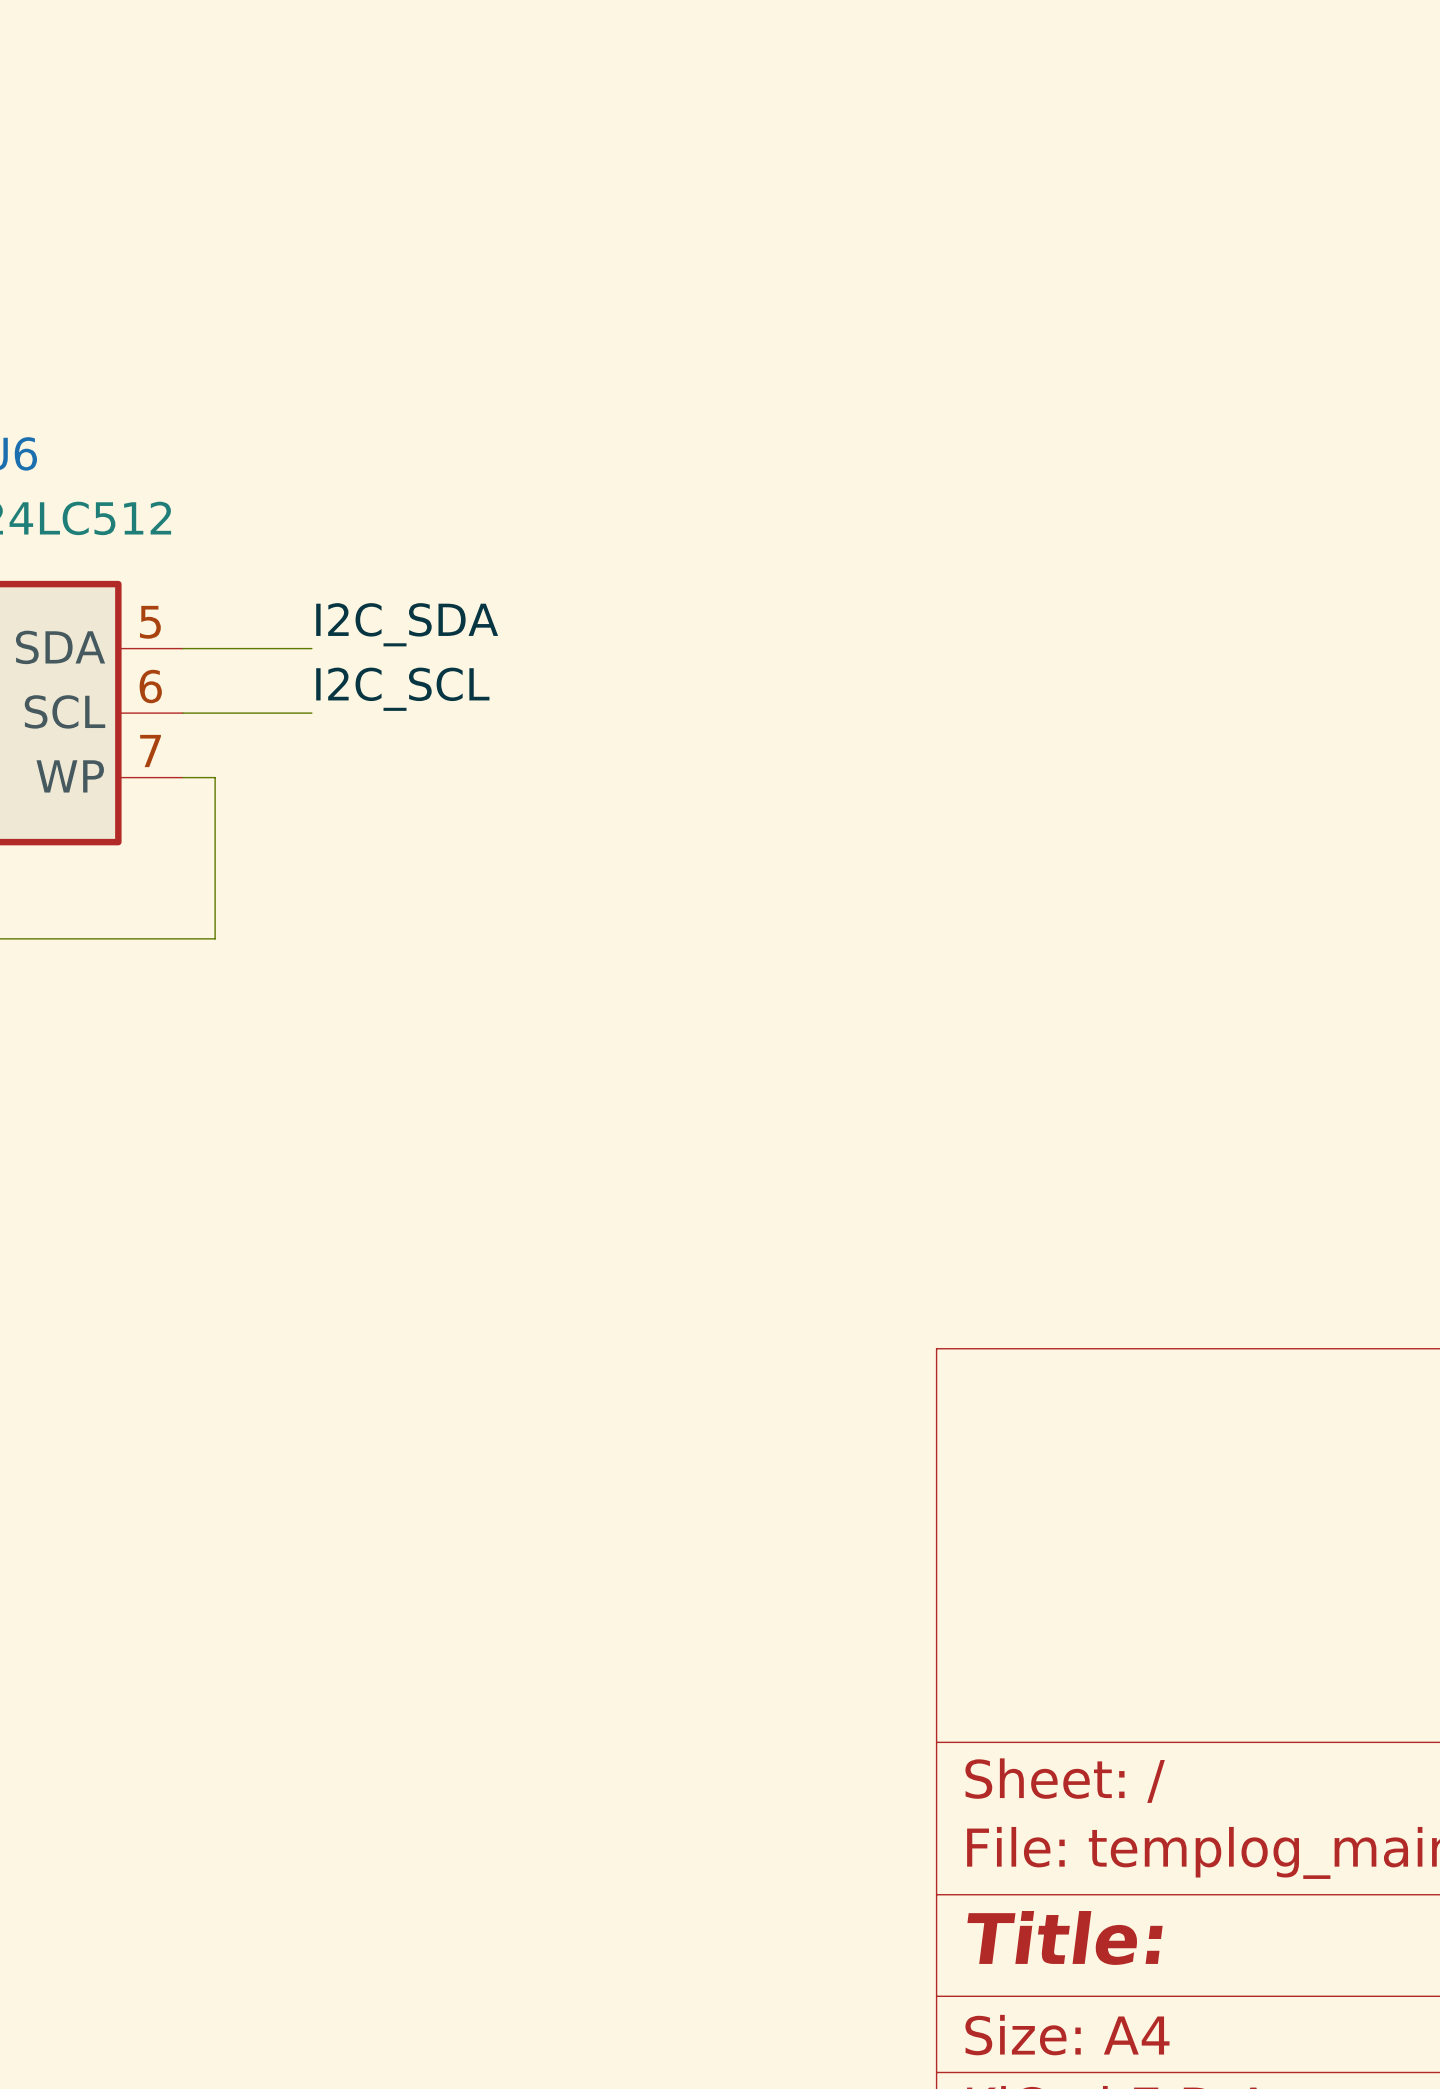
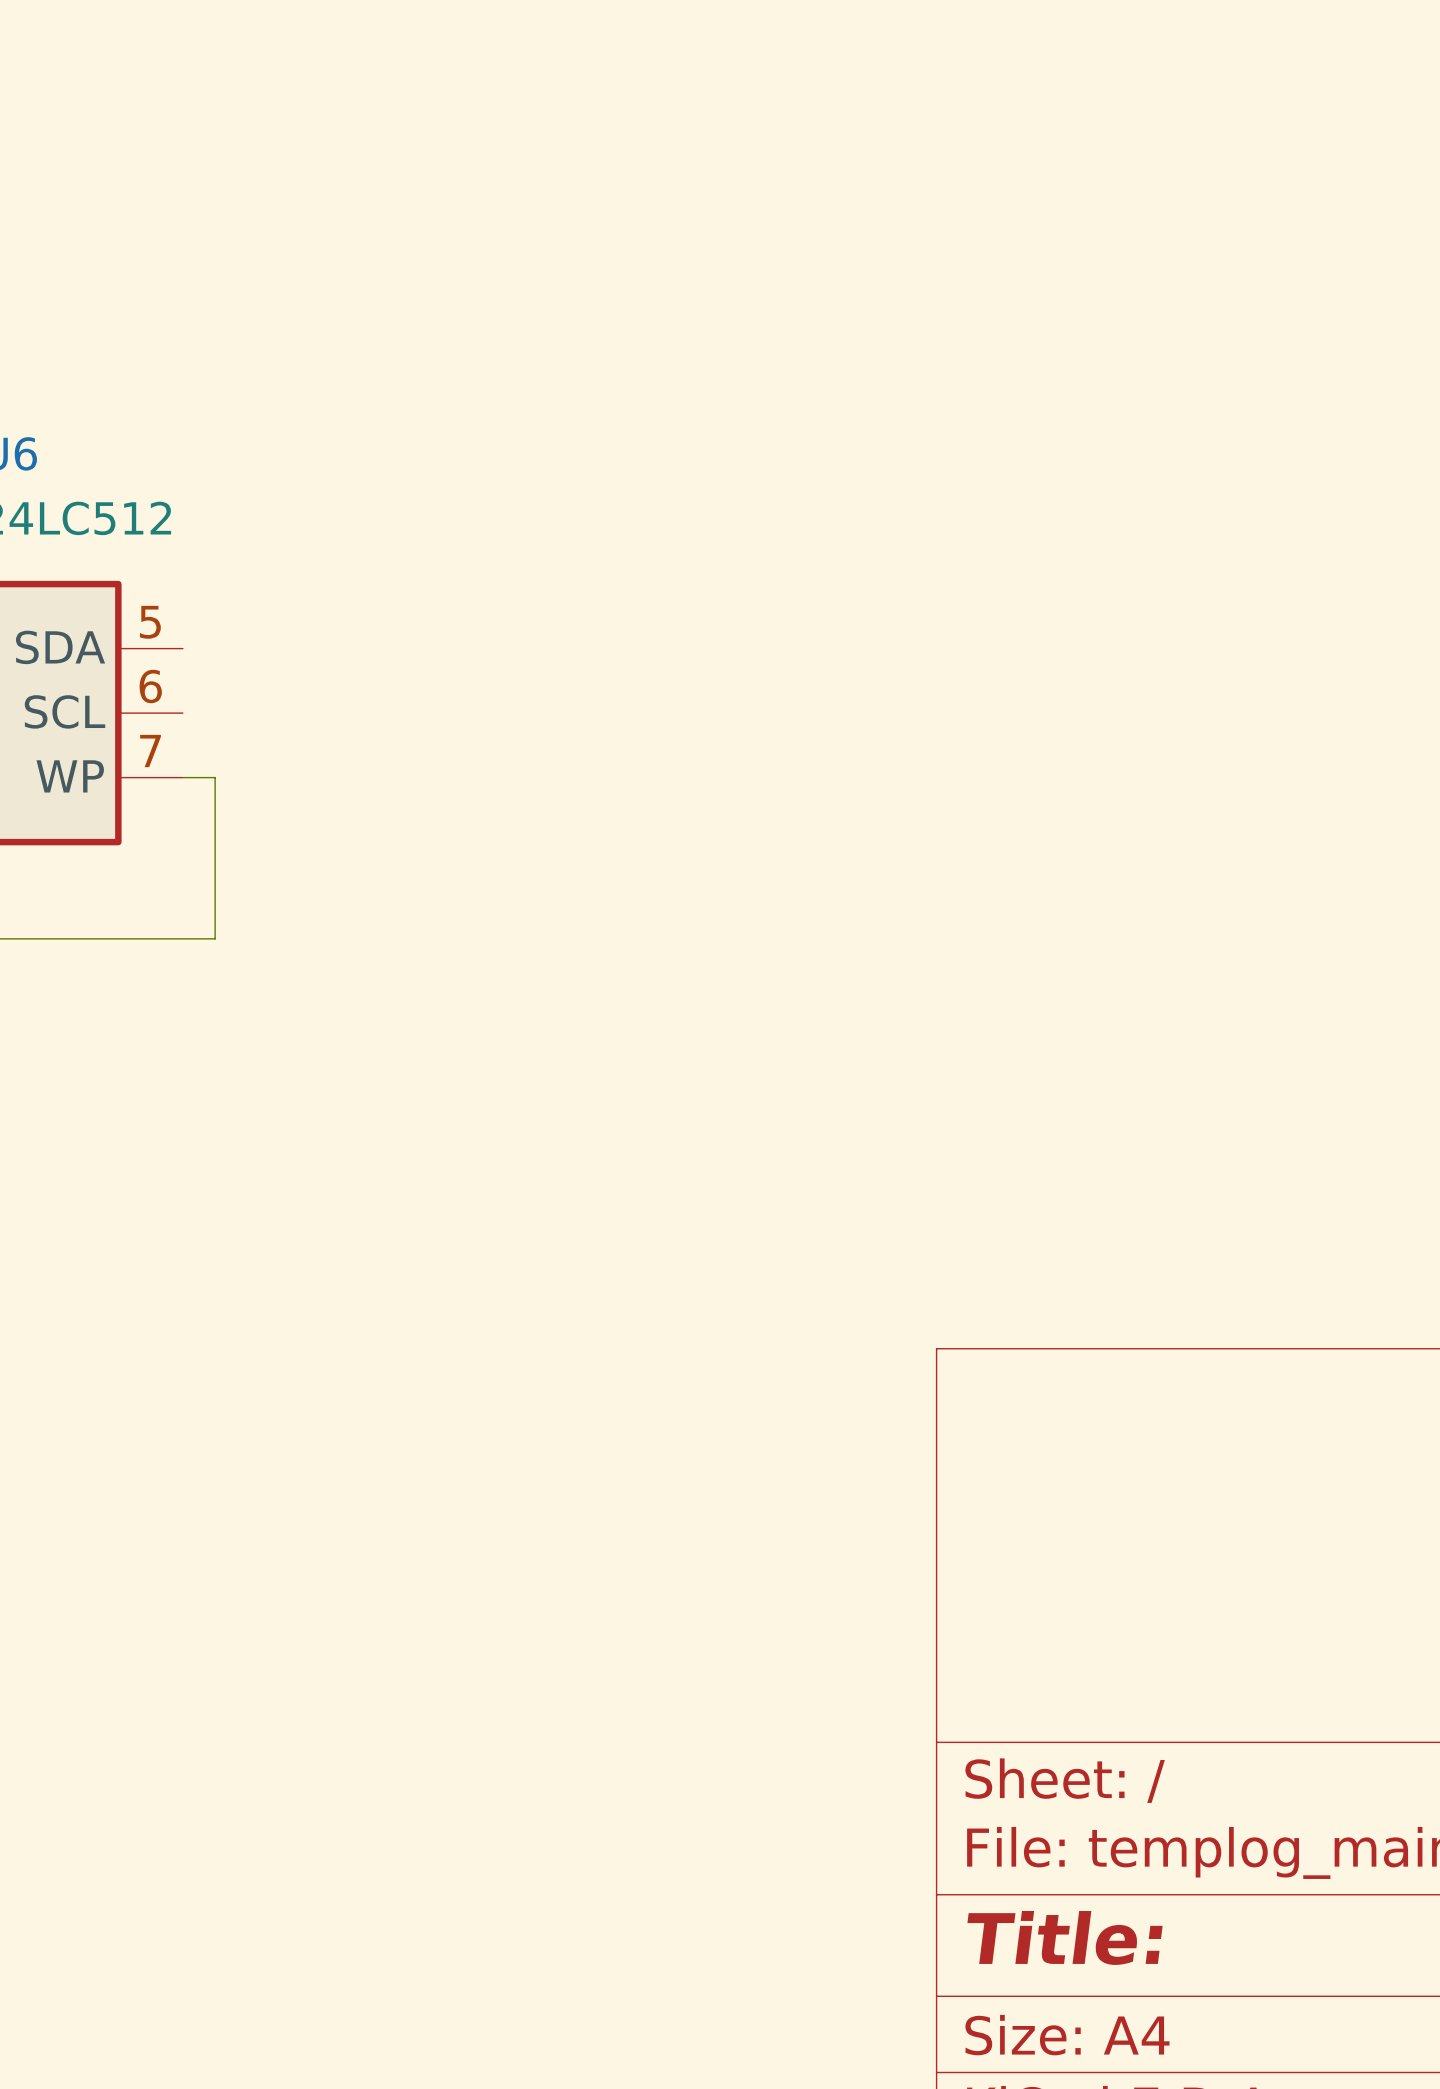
label: I2C_SDA (407, 624) -> none
wire: (182, 648) (311, 648) -> none
label: I2C_SCL (402, 689) -> none
wire: (182, 713) (311, 713) -> none

